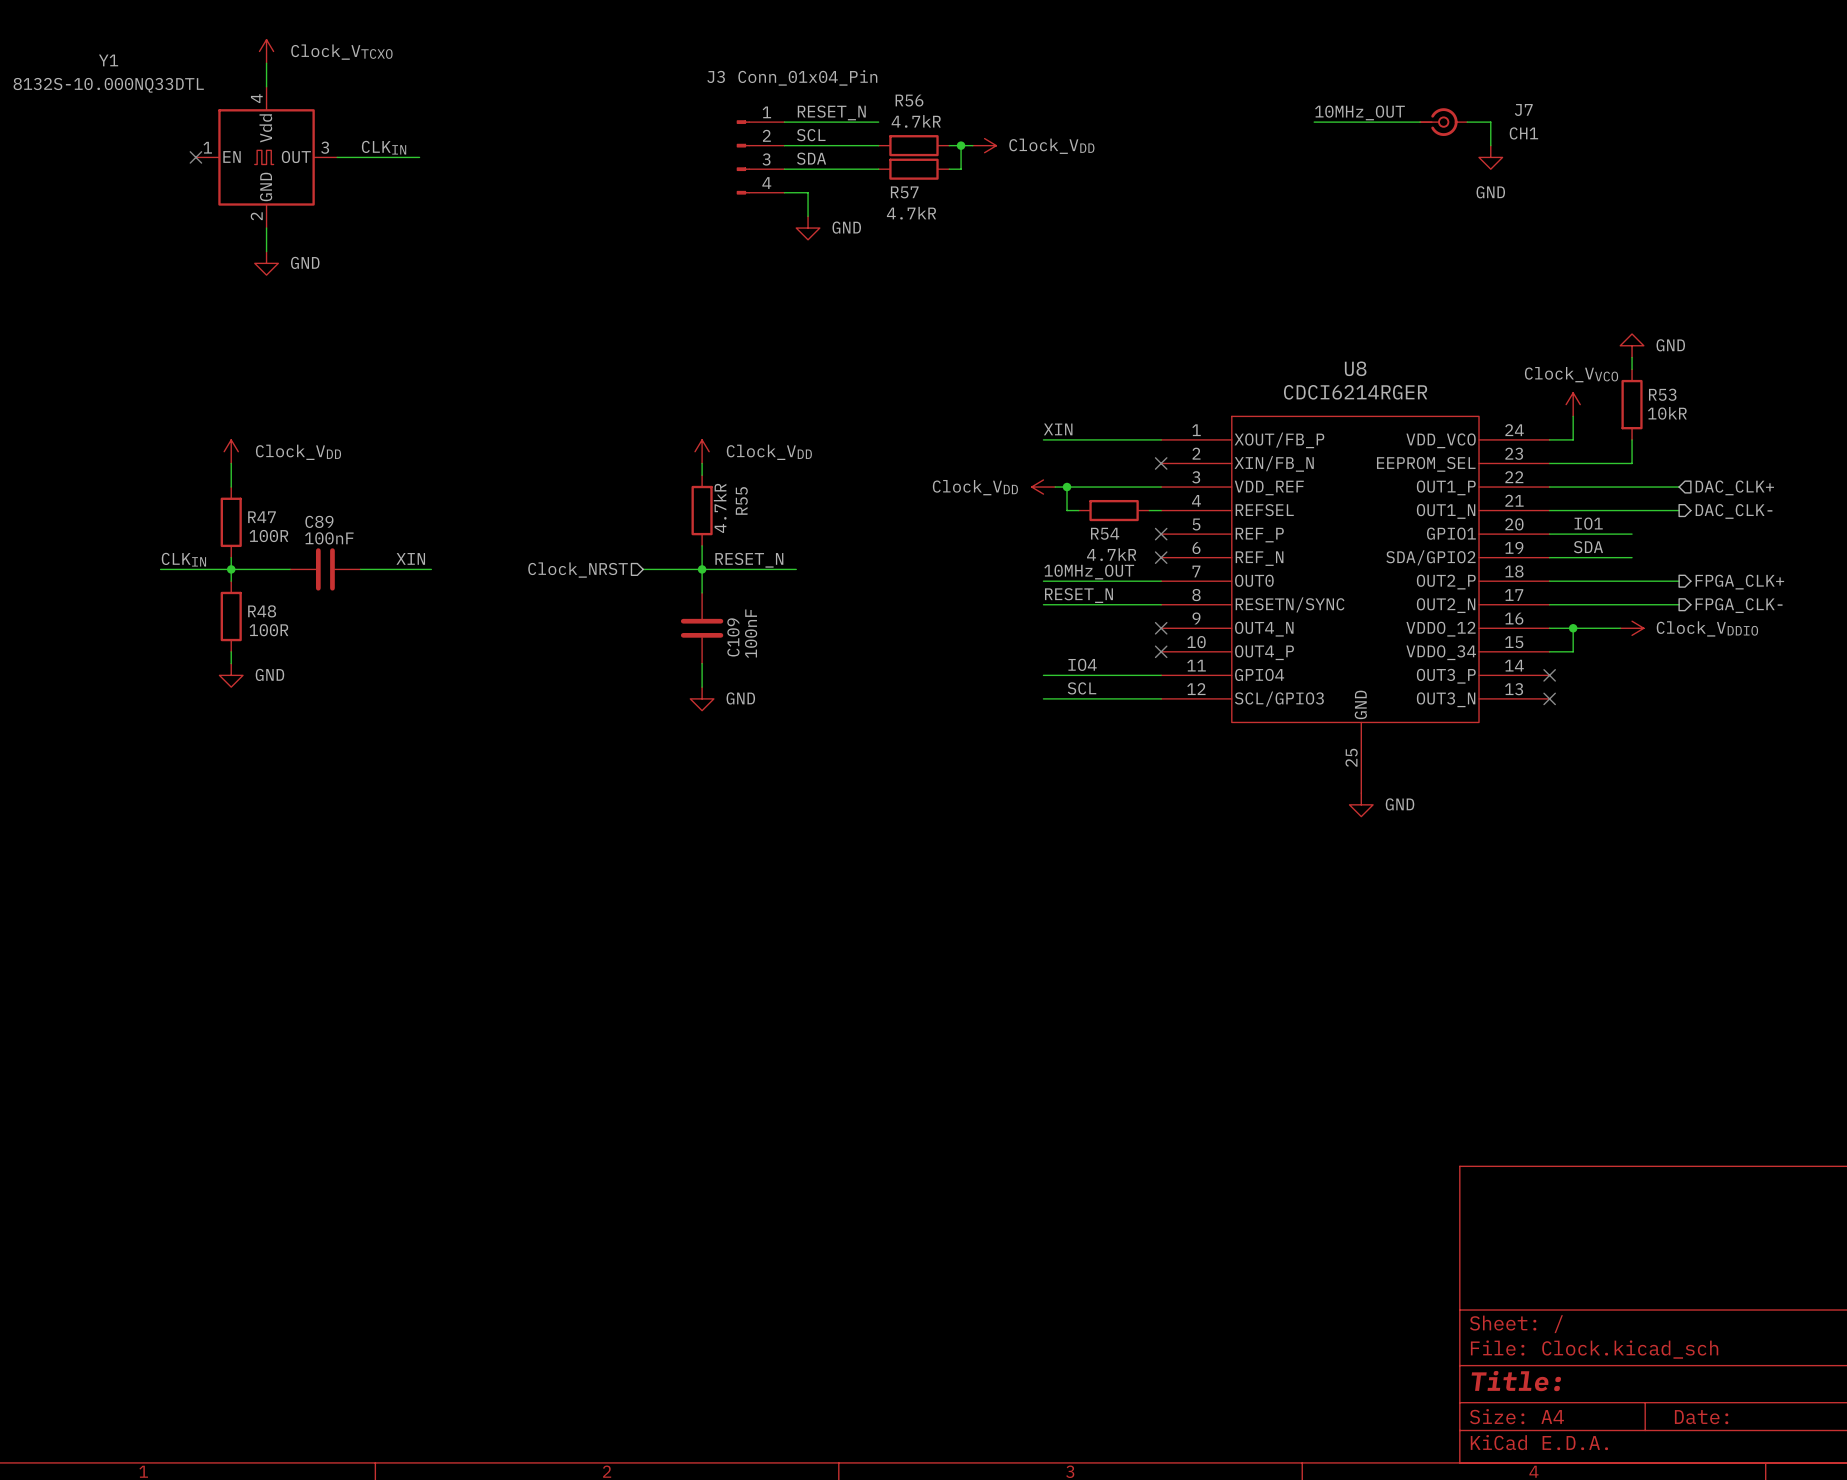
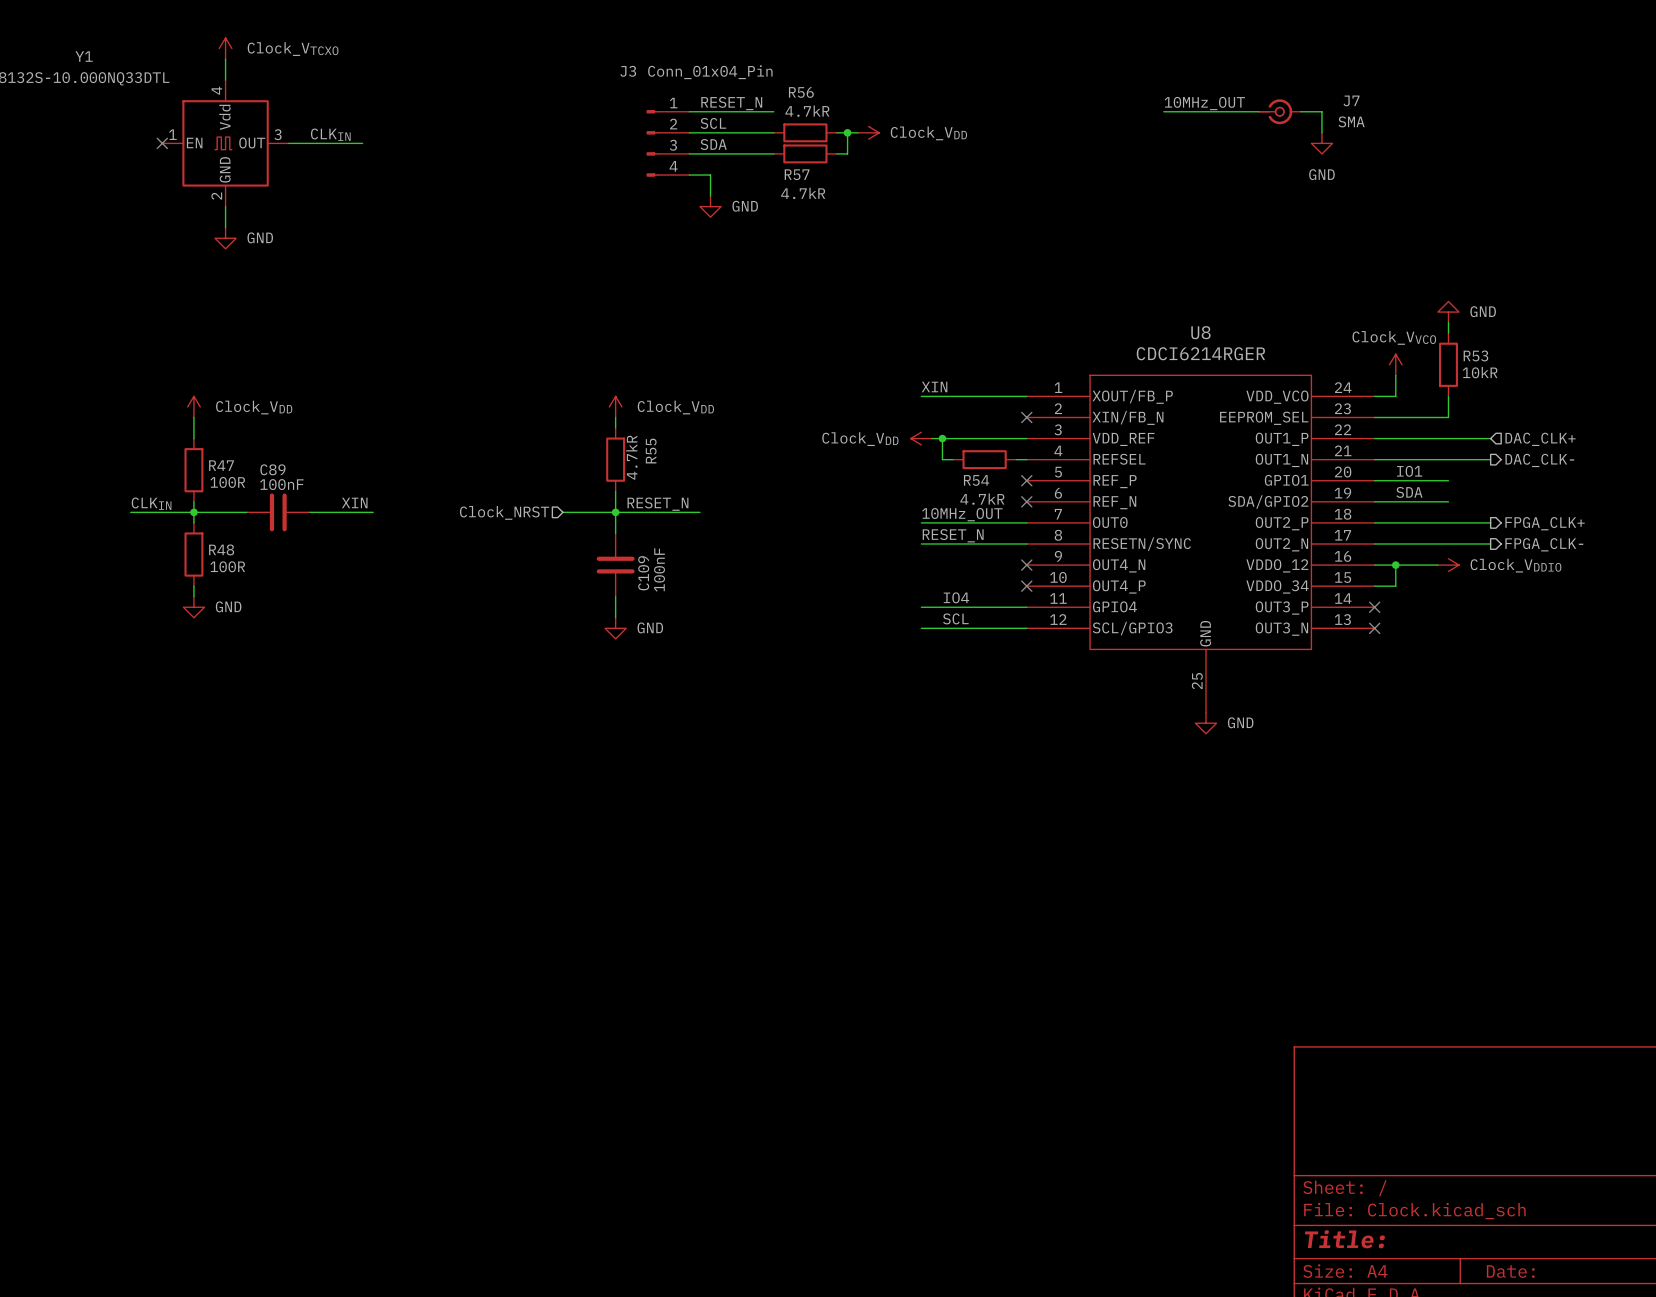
J7 value: CH1 (1523, 133) -> SMA (1351, 121)

